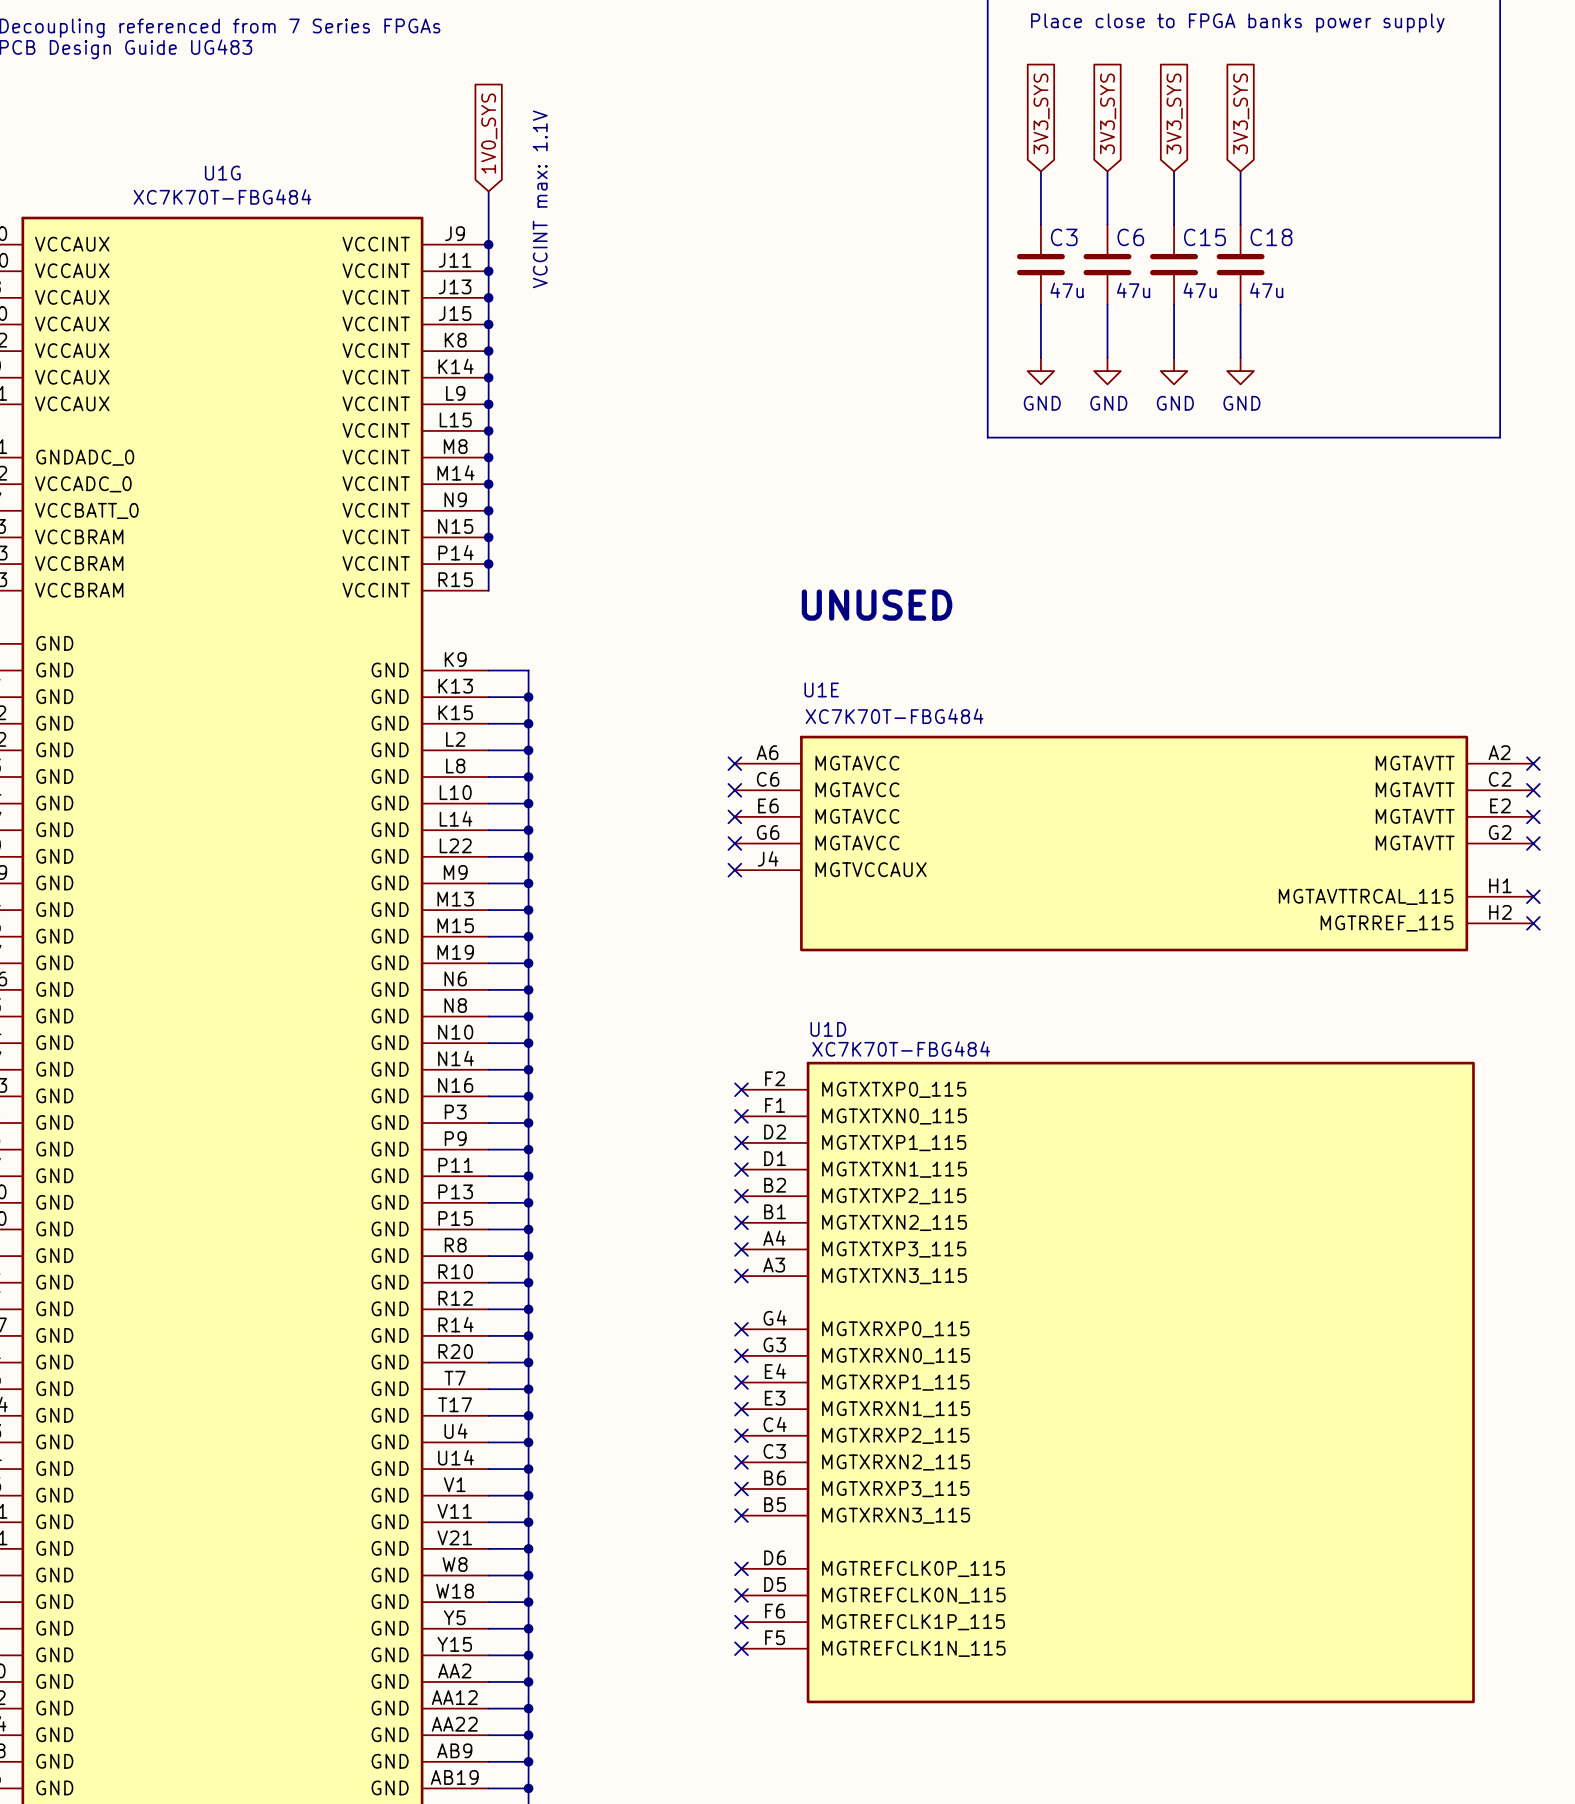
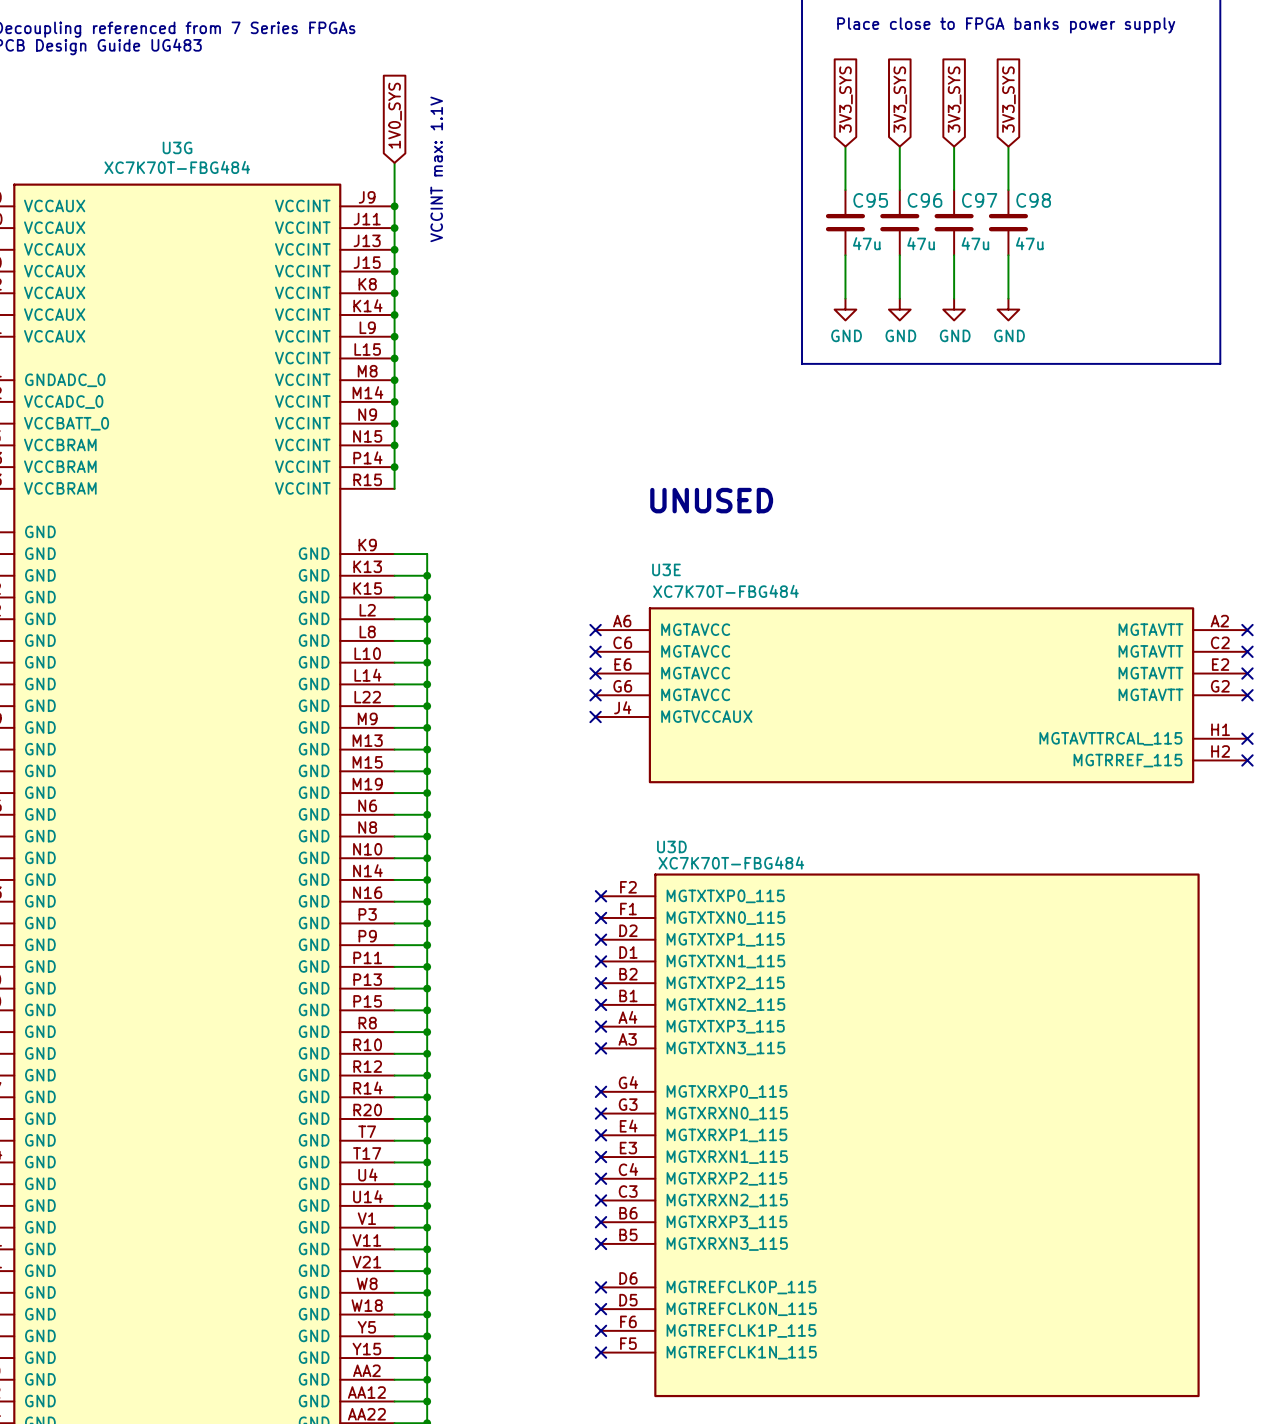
U1G name: U1G (222, 173) -> U3G (177, 147)
C3 name: C3 (1064, 237) -> C95 (870, 200)
C6 name: C6 (1130, 237) -> C96 (925, 200)
C15 name: C15 (1204, 237) -> C97 (979, 200)
C18 name: C18 (1271, 237) -> C98 (1033, 200)
U1E name: U1E (821, 689) -> U3E (666, 569)
U1D name: U1D (828, 1029) -> U3D (671, 846)

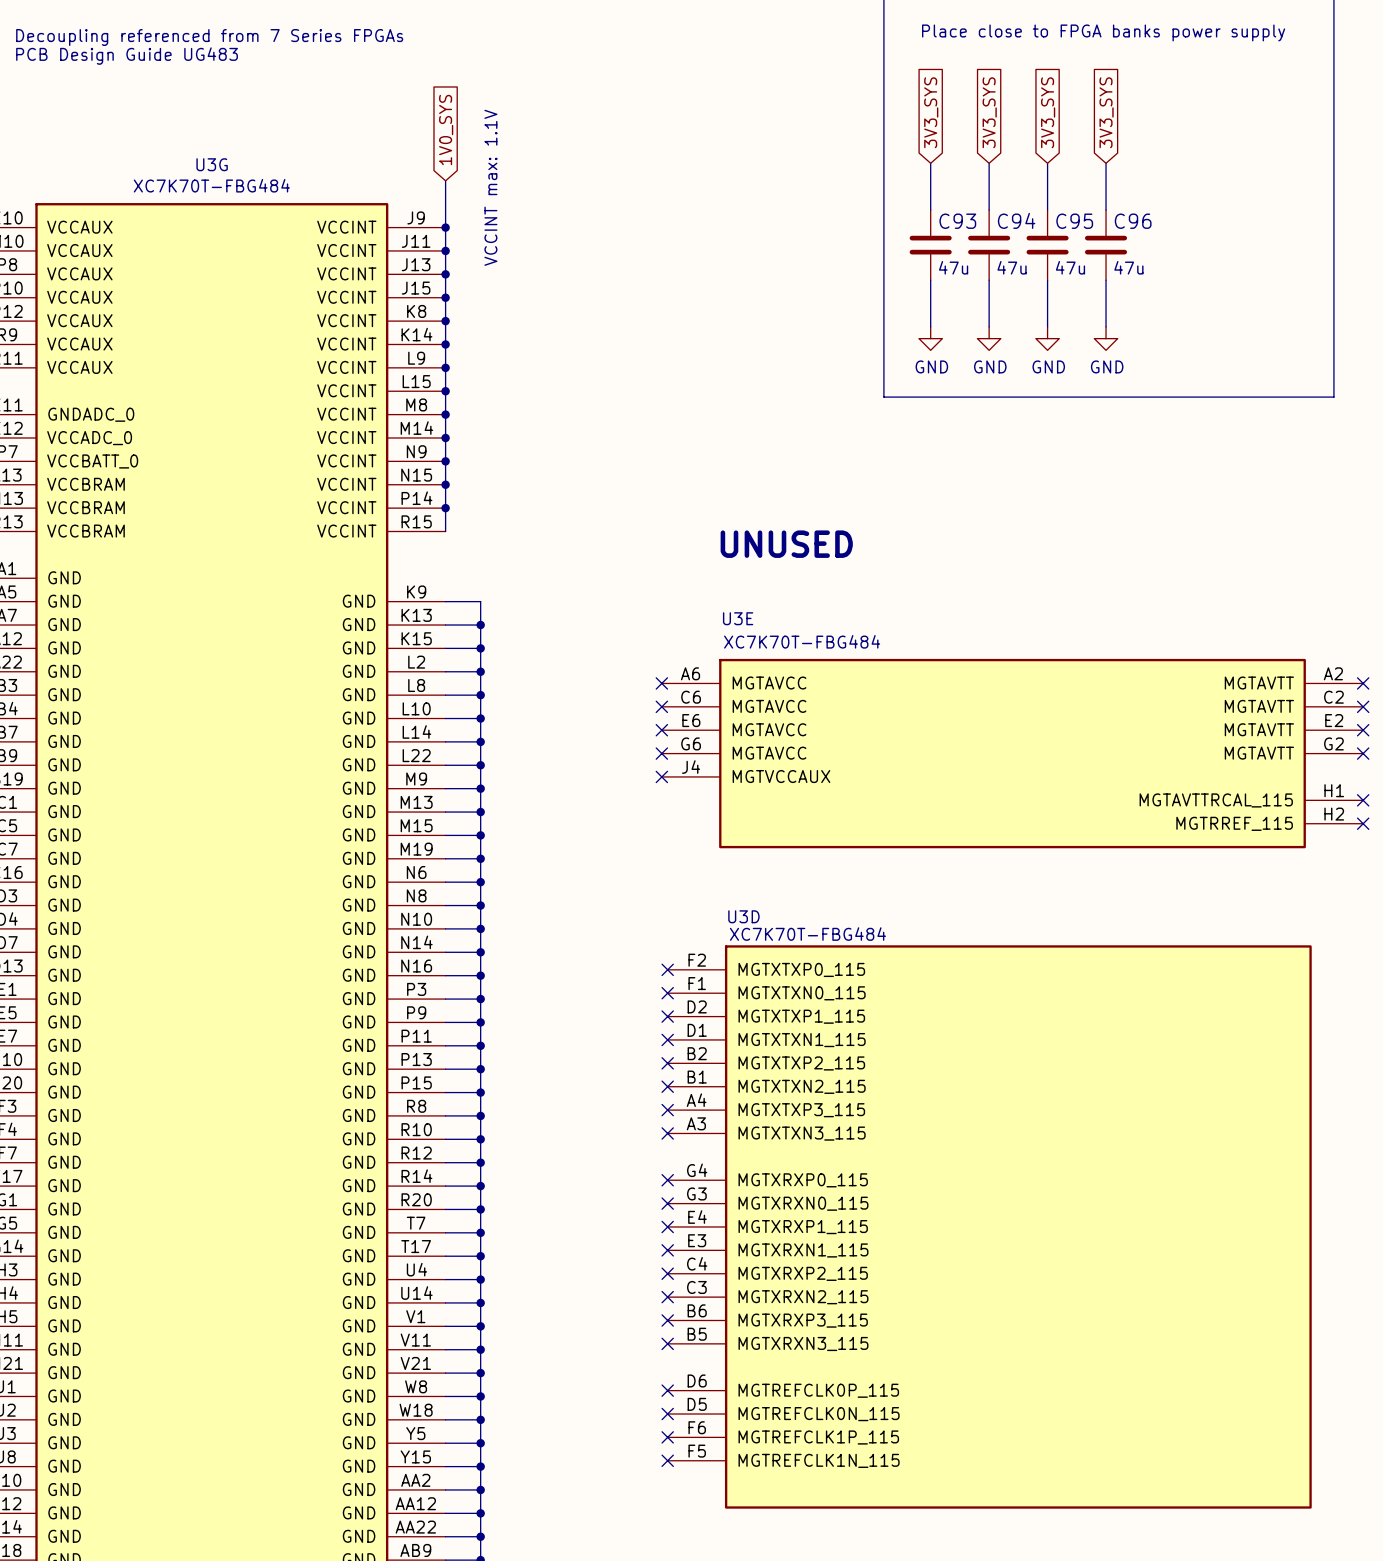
C95 name: C95 (870, 200) -> C93 (957, 221)
C96 name: C96 (925, 200) -> C94 (1016, 220)
C97 name: C97 (979, 200) -> C95 (1074, 221)
C98 name: C98 (1033, 200) -> C96 (1133, 221)

